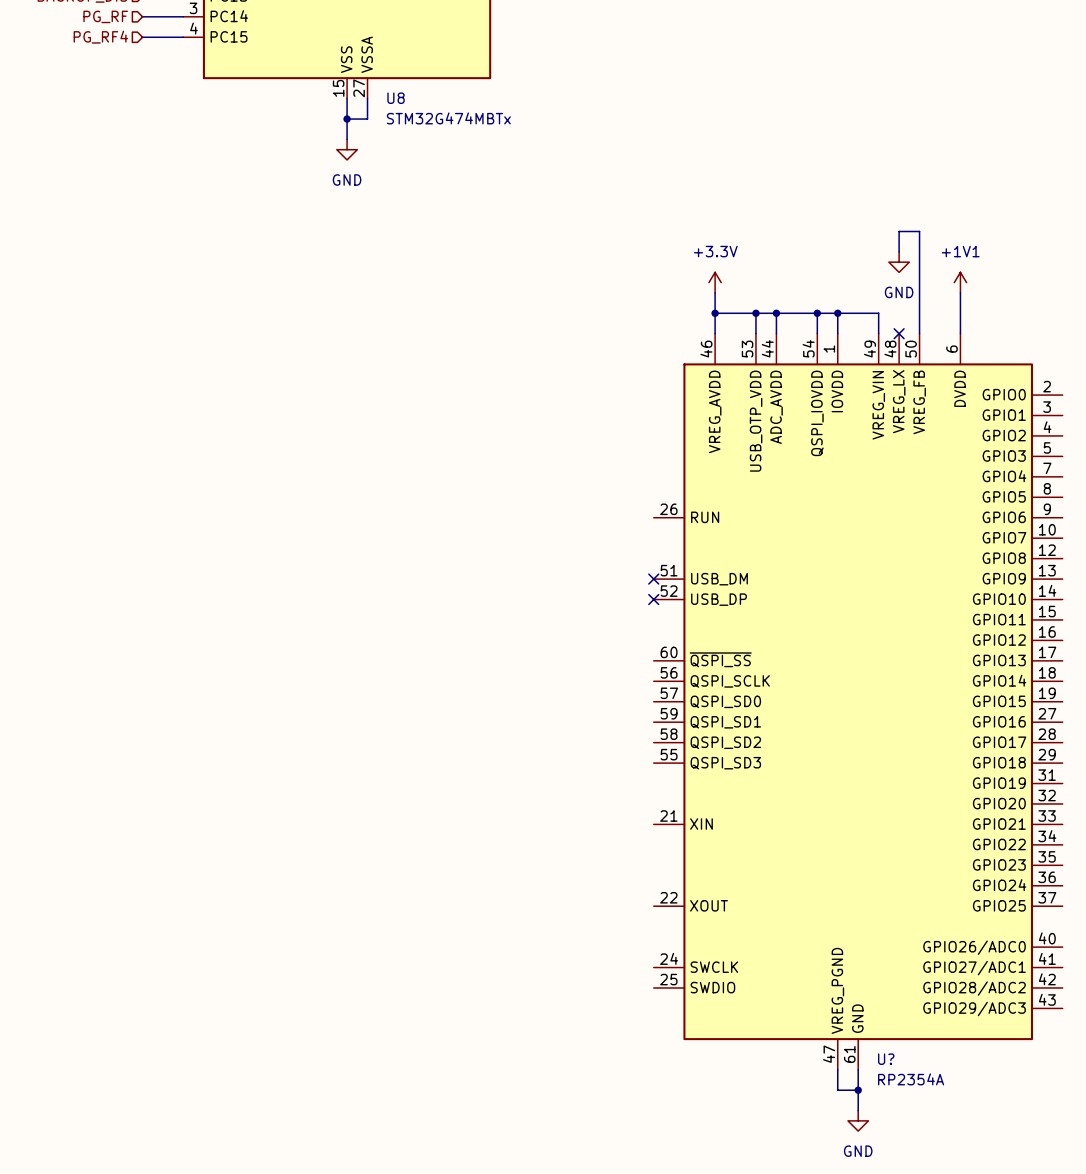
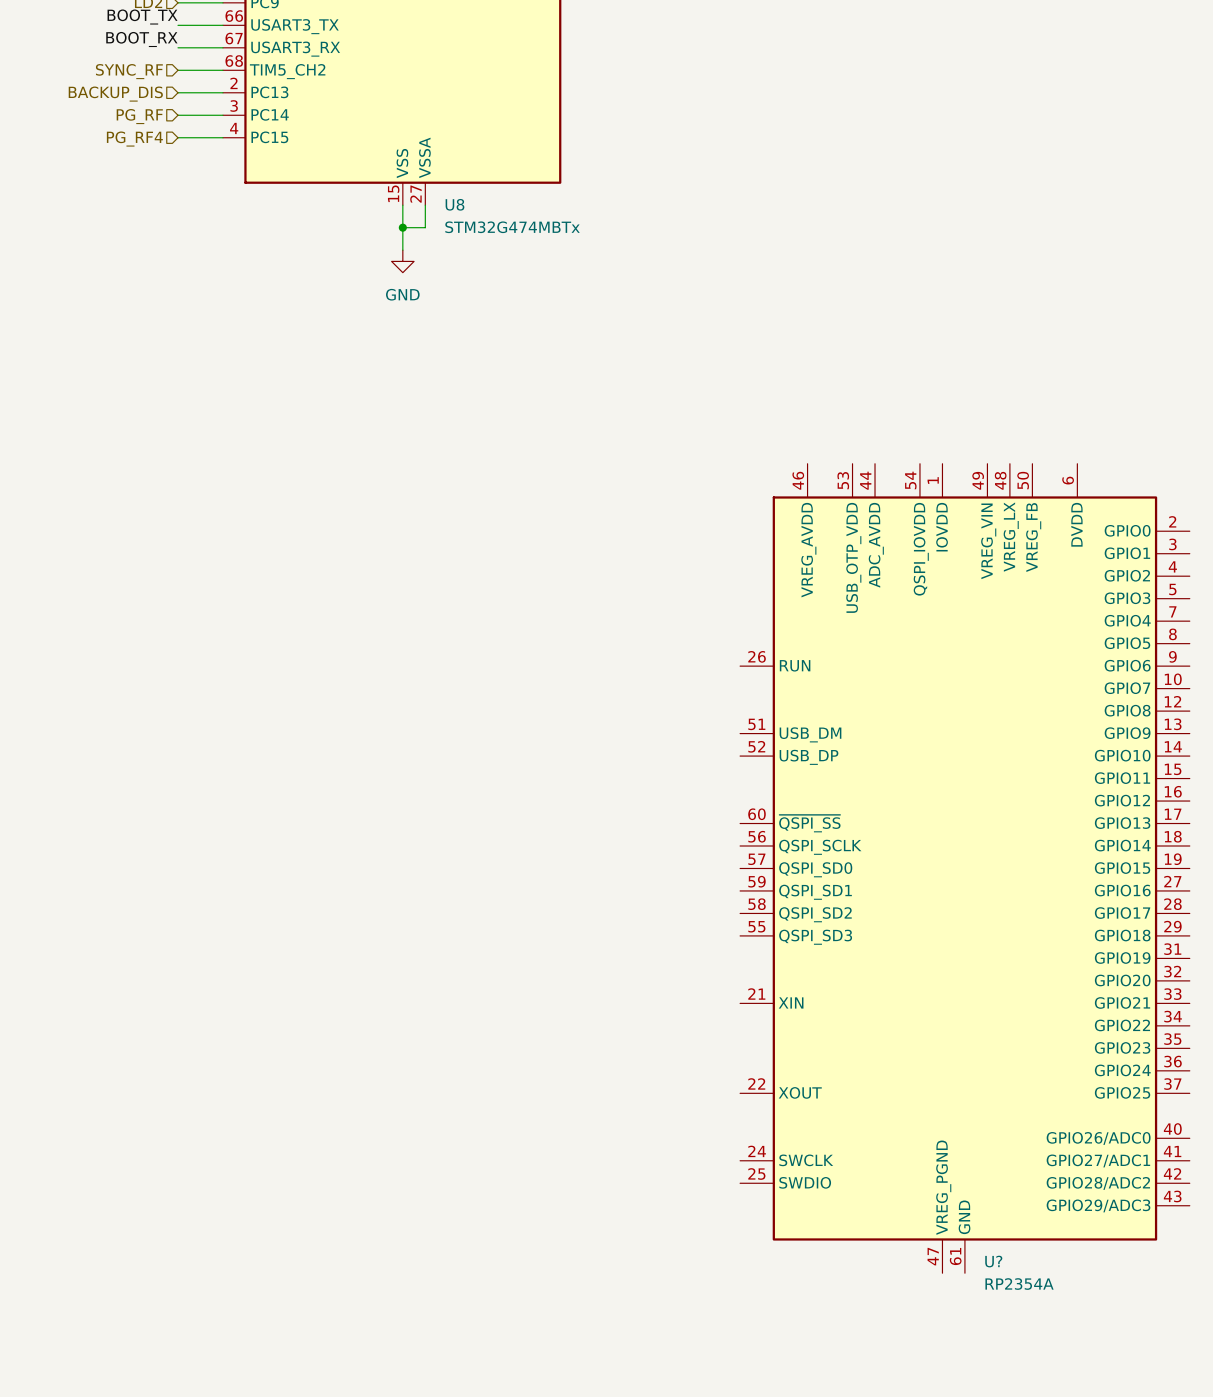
wire: (899, 251) (899, 231) (919, 231) (919, 333) -> none
power symbol: GND (899, 262) -> none
power symbol: +3.3V (715, 282) -> none
power symbol: +1V1 (960, 282) -> none
wire: (715, 292) (715, 333) -> none
wire: (960, 292) (960, 333) -> none
wire: (715, 313) (878, 313) (878, 333) -> none
junction: (715, 313) -> none
wire: (755, 313) (755, 333) -> none
junction: (755, 313) -> none
wire: (776, 313) (776, 333) -> none
junction: (776, 313) -> none
wire: (817, 313) (817, 333) -> none
junction: (817, 313) -> none
wire: (837, 313) (837, 333) -> none
junction: (837, 313) -> none
no-connect mark: (899, 333) -> none
no-connect mark: (653, 579) -> none
no-connect mark: (653, 599) -> none
wire: (837, 1069) (837, 1090) (858, 1090) -> none
wire: (858, 1069) (858, 1110) -> none
junction: (858, 1090) -> none
power symbol: GND (858, 1120) -> none

